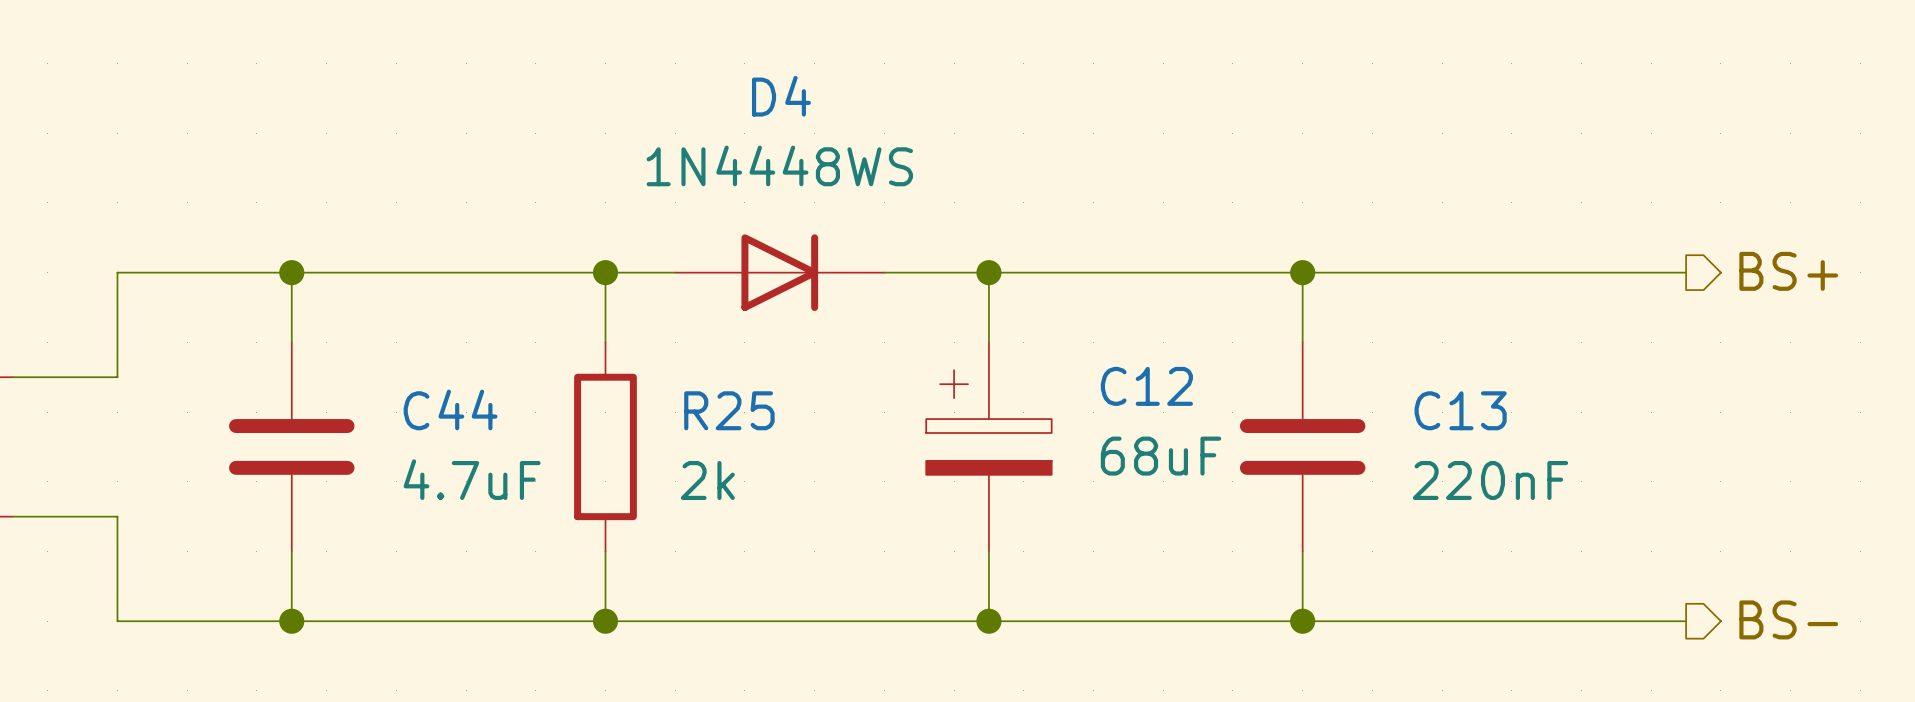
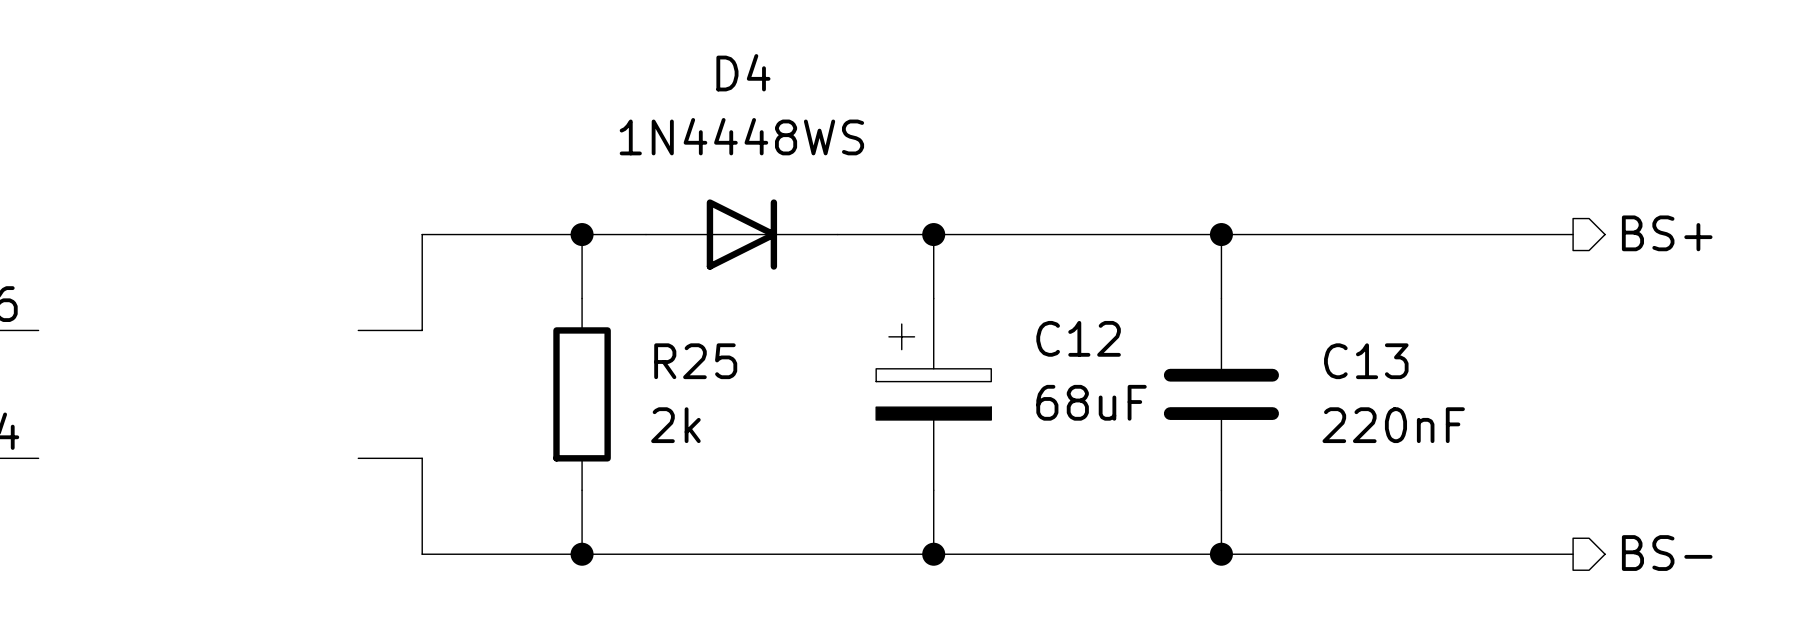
wire: (291, 272) (291, 342) -> none
junction: (291, 272) -> none
wire: (431, 272) (117, 272) (117, 377) (12, 377) -> (422, 234) (422, 330) (358, 330)
C44: 4.7uF (291, 446) -> none
wire: (12, 516) (117, 516) (117, 621) (431, 621) -> (358, 458) (422, 458) (422, 554)
wire: (291, 551) (291, 621) -> none
junction: (291, 621) -> none

